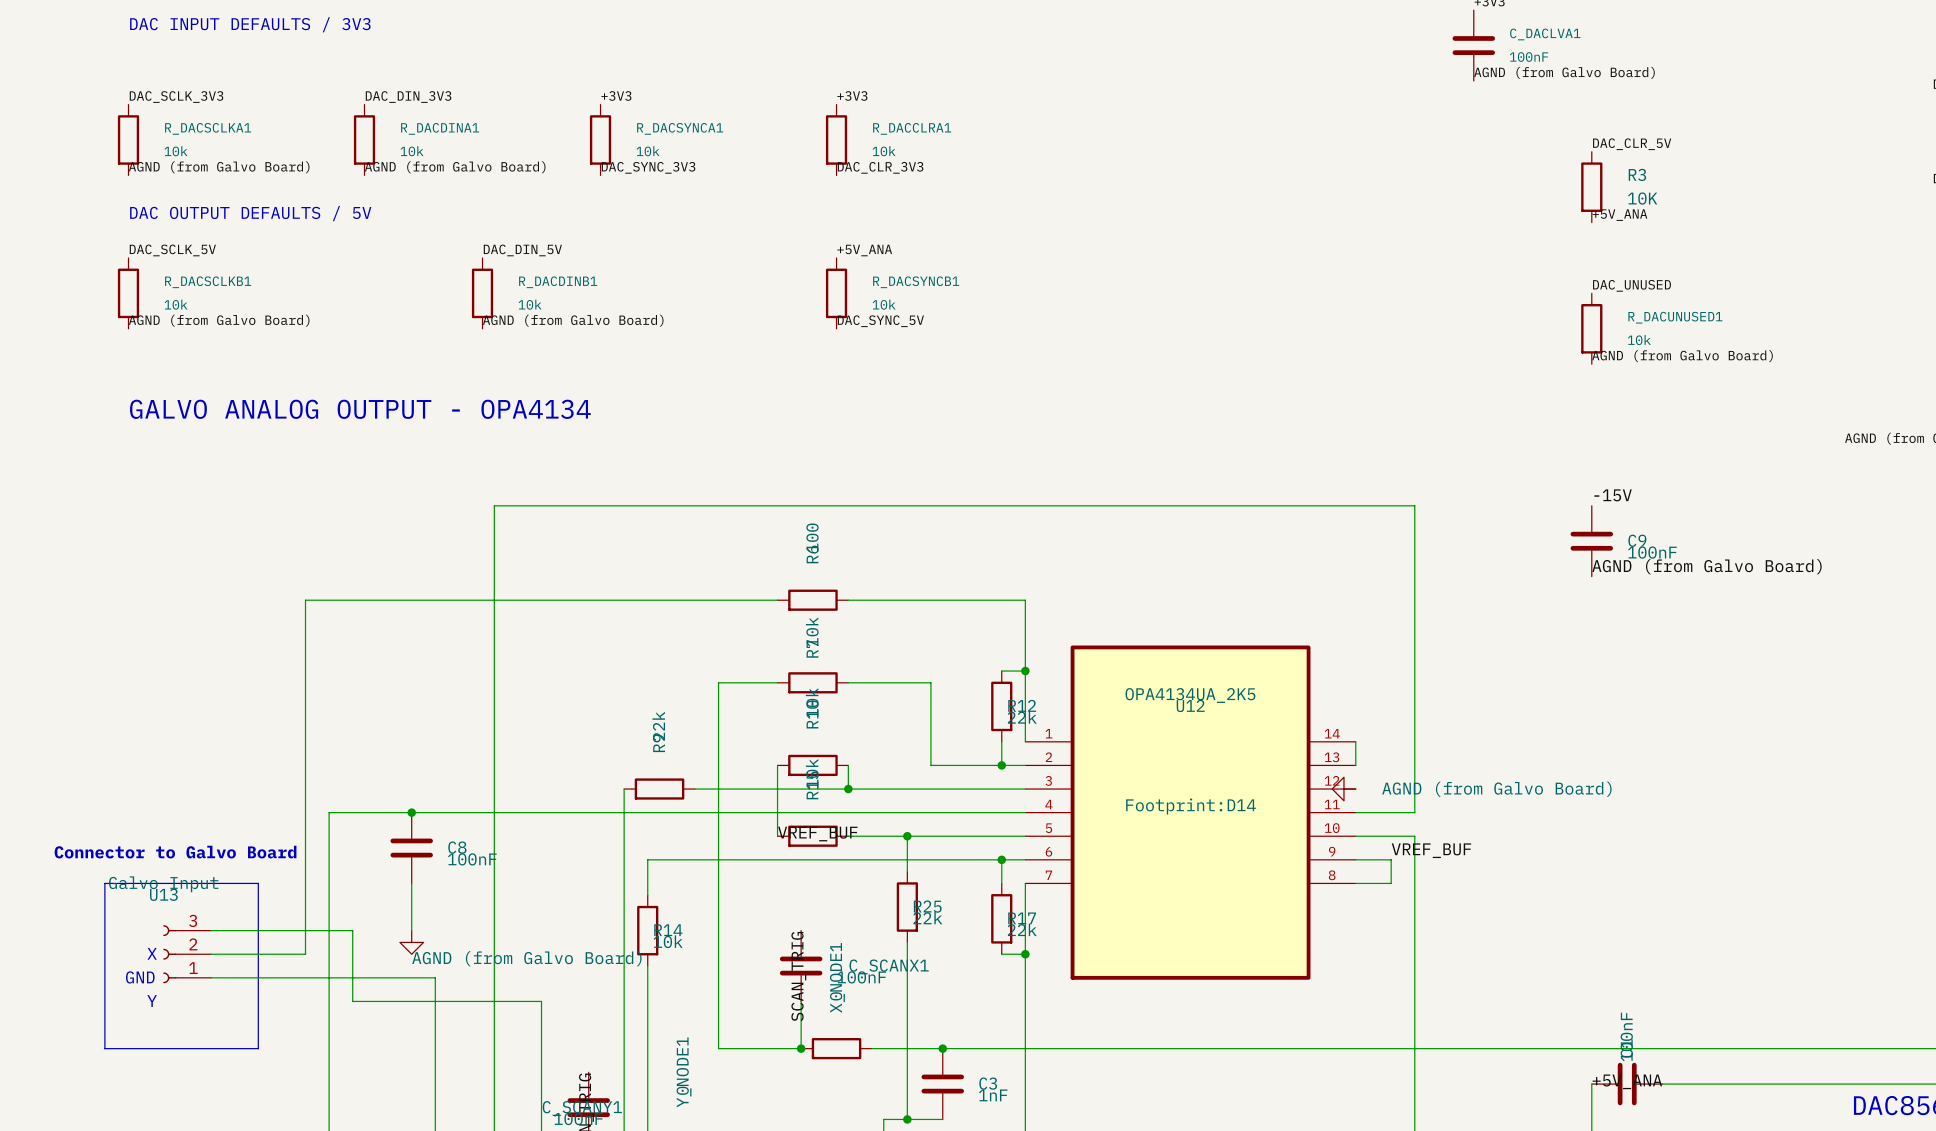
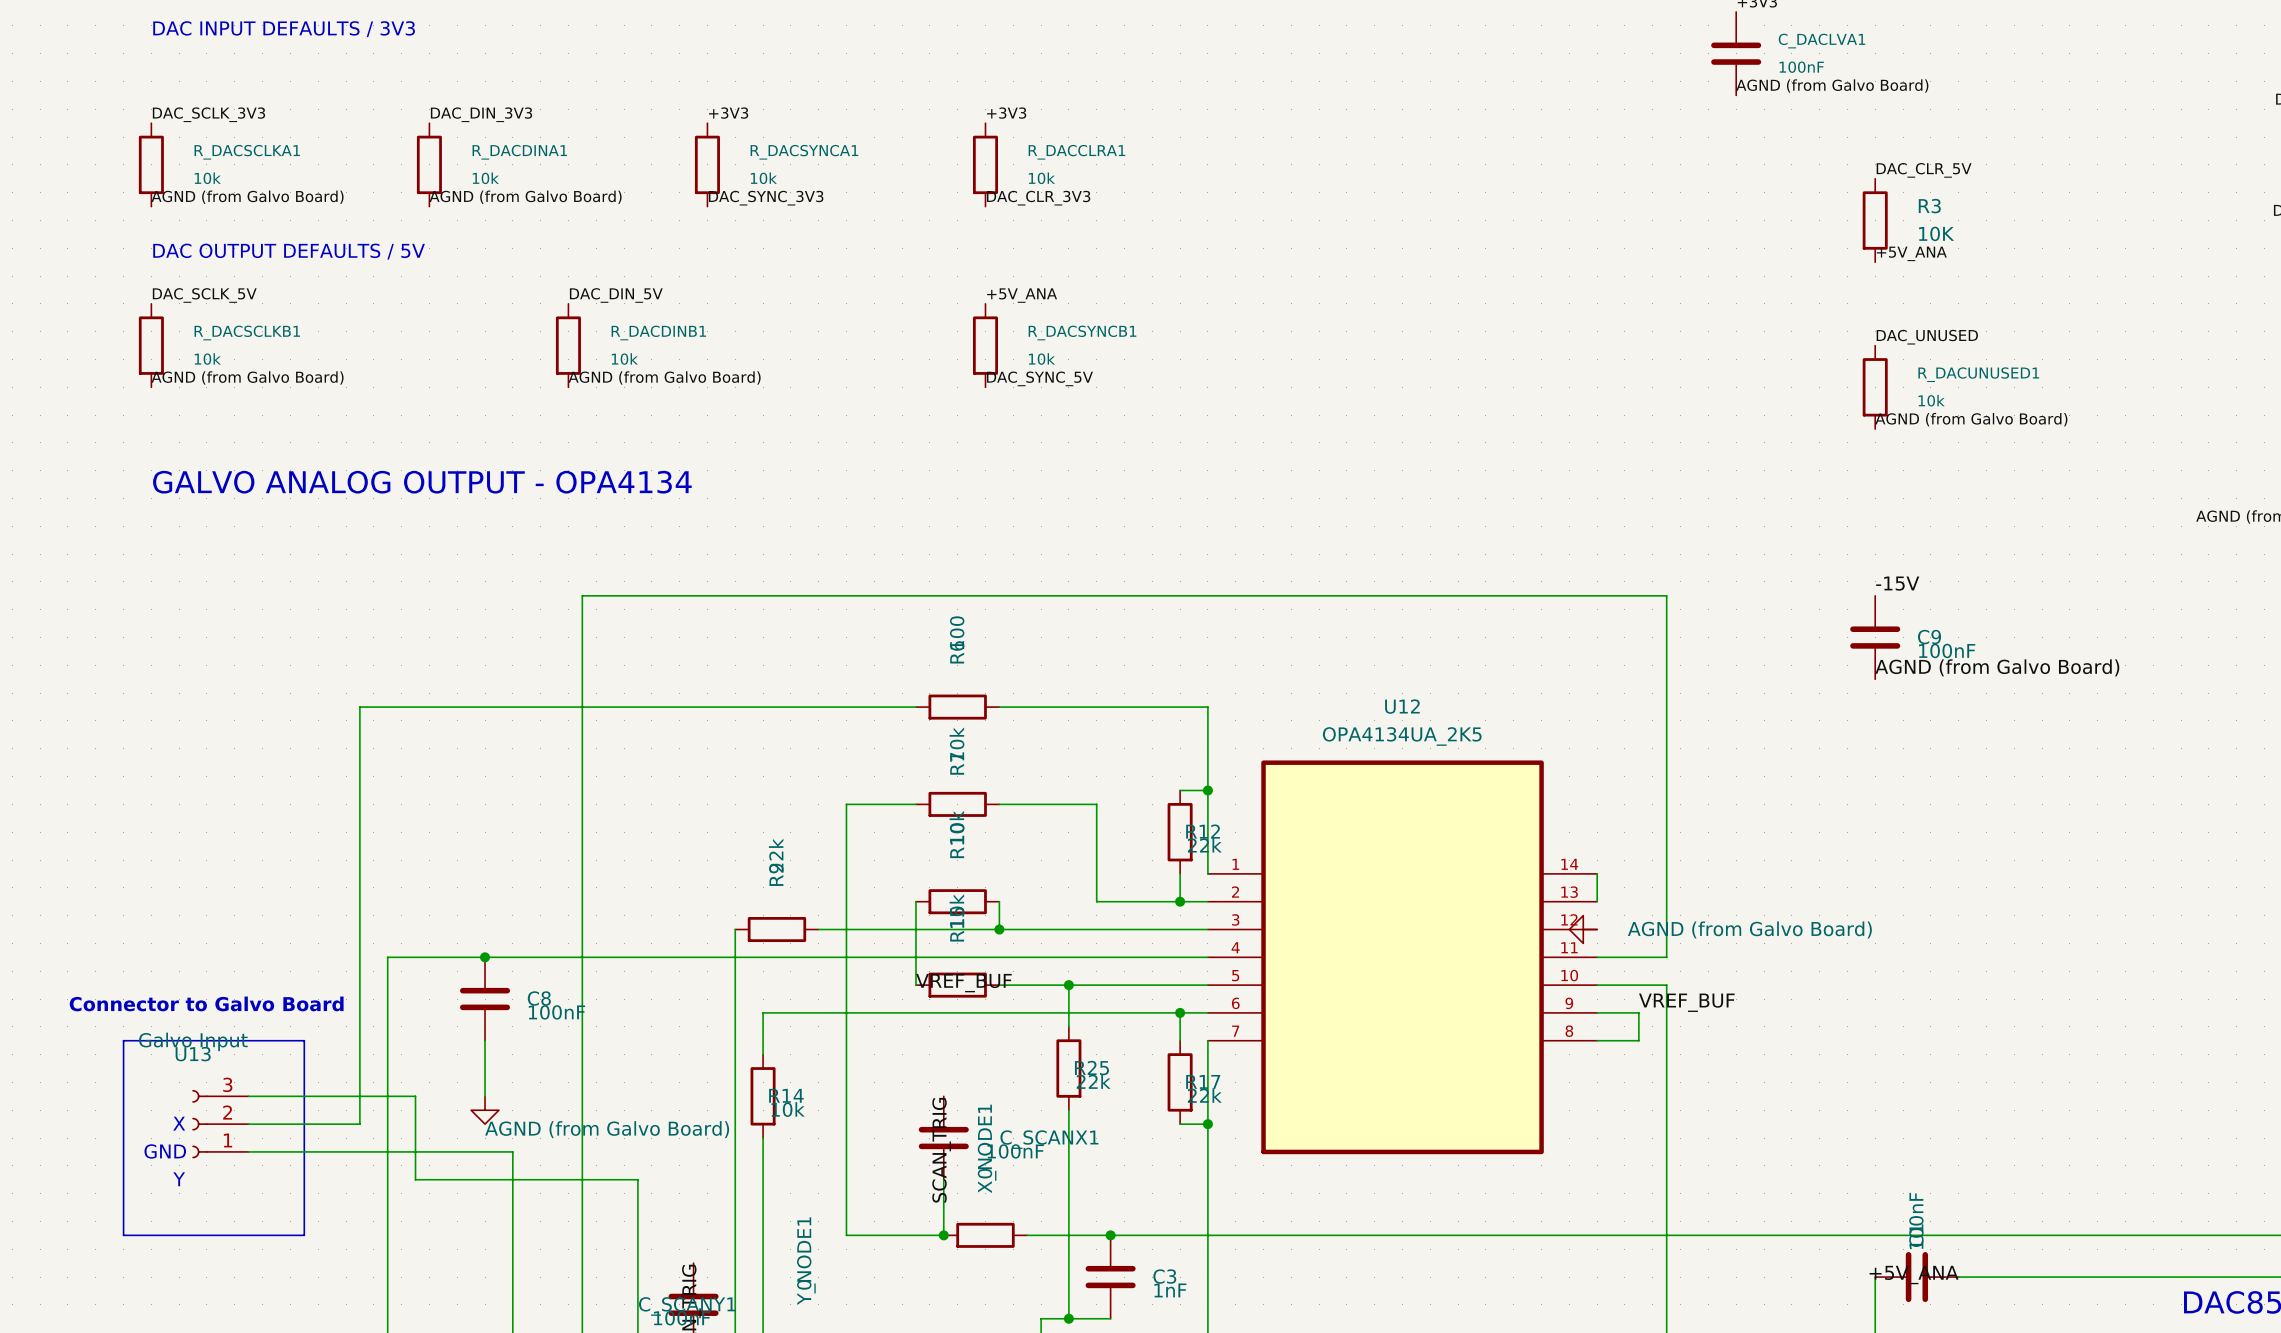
U12 value position: OPA4134UA_2K5 (1190, 695) -> OPA4134UA_2K5 (1402, 736)
U12 name position: U12 (1190, 705) -> U12 (1402, 706)
U12 text: Footprint:D14 (1191, 806) -> none

